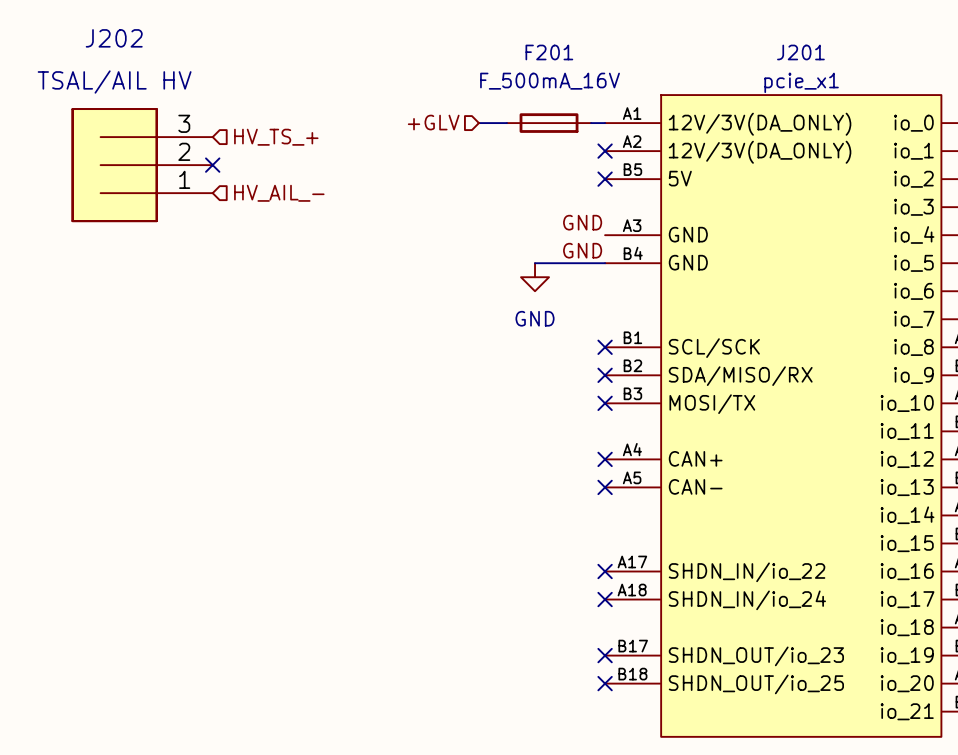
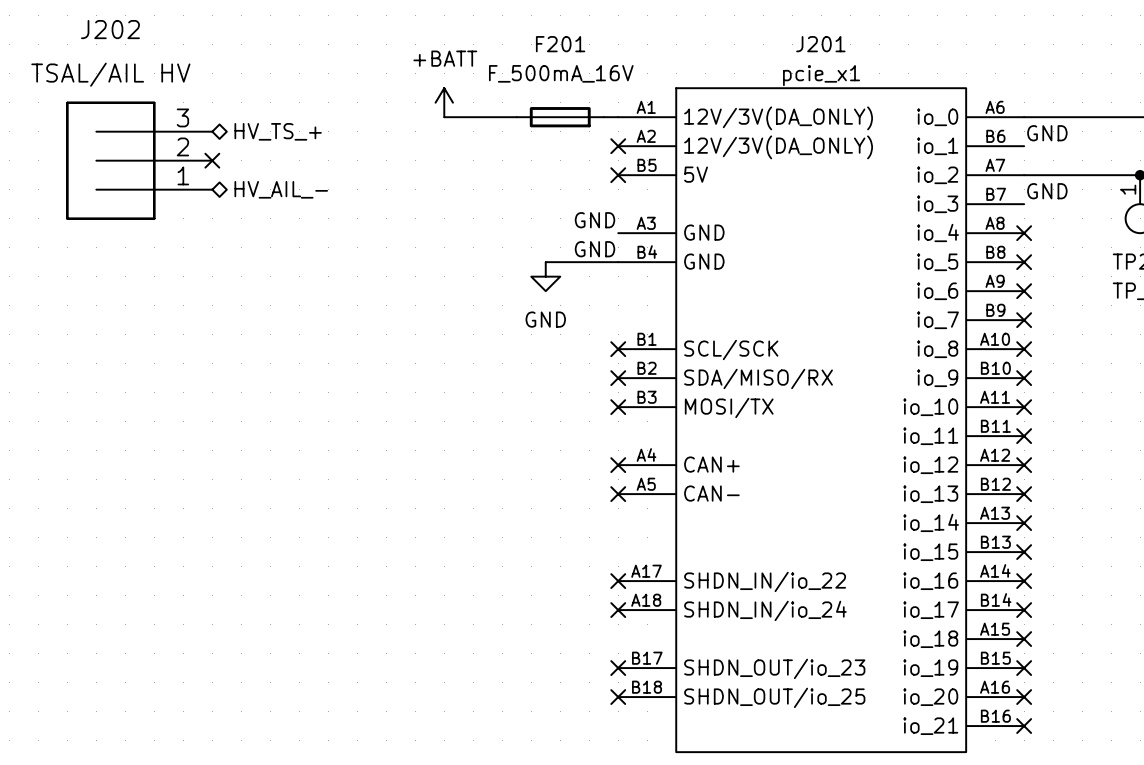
power symbol: none -> +BATT (444, 102)
hierarchical label: +GLV (433, 122) -> none
wire: none -> (444, 117) (487, 117)
hierarchical label shape: input (276, 137) -> bidirectional (278, 131)
hierarchical label shape: input (279, 193) -> bidirectional (281, 189)

